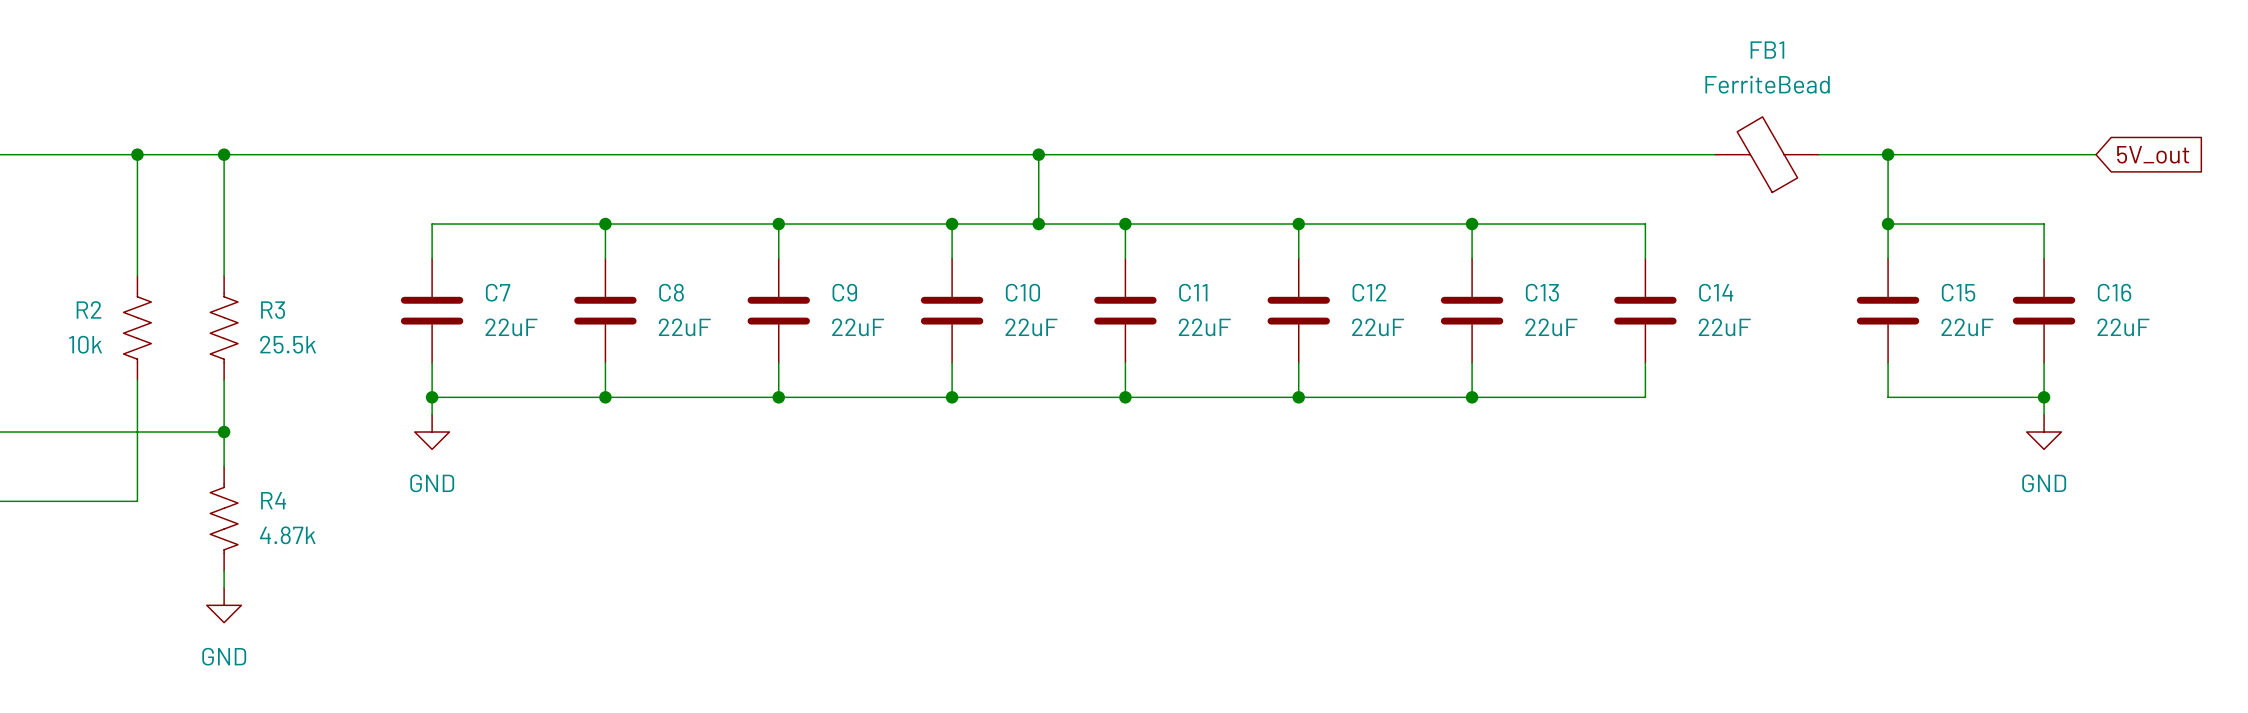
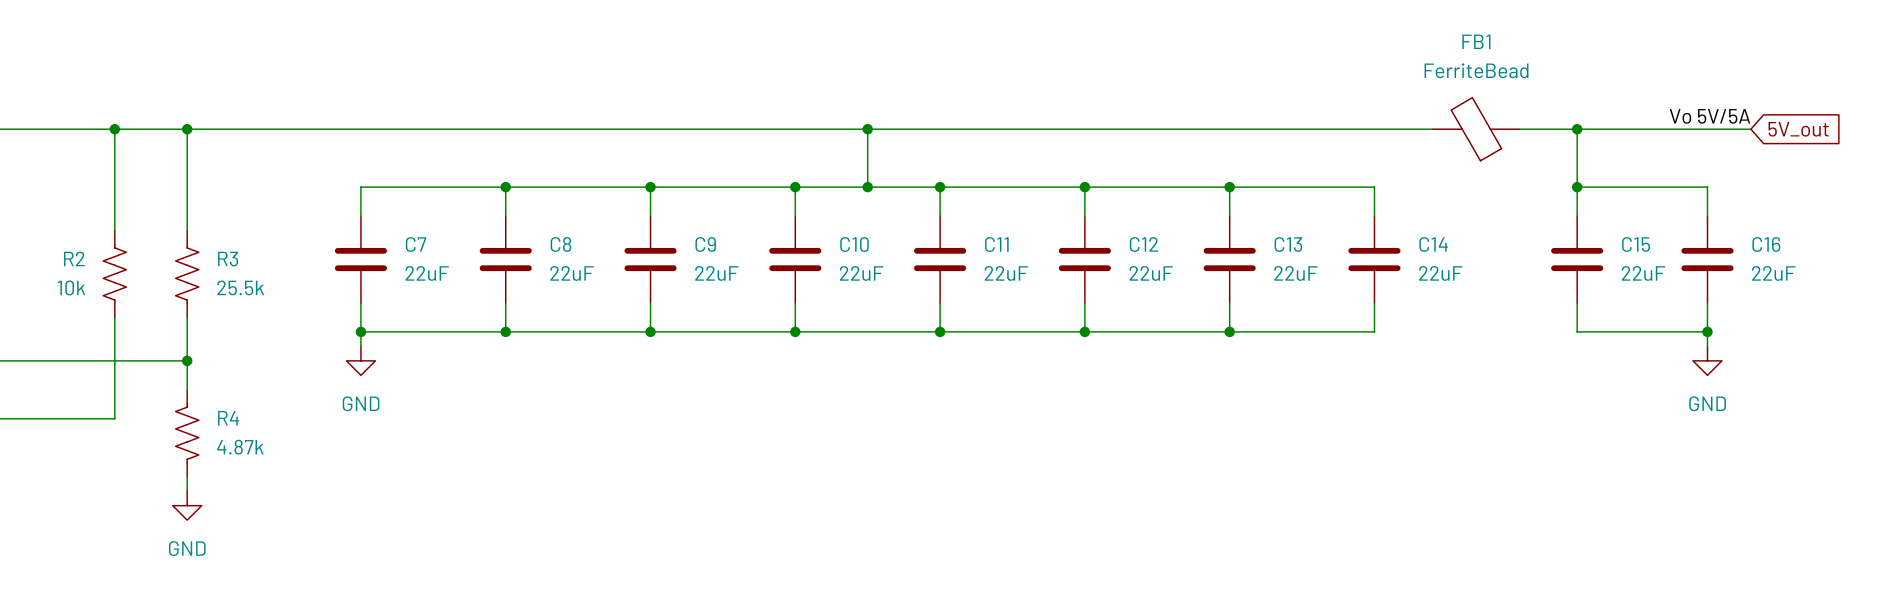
label: none -> Vo 5V/5A (1709, 116)

